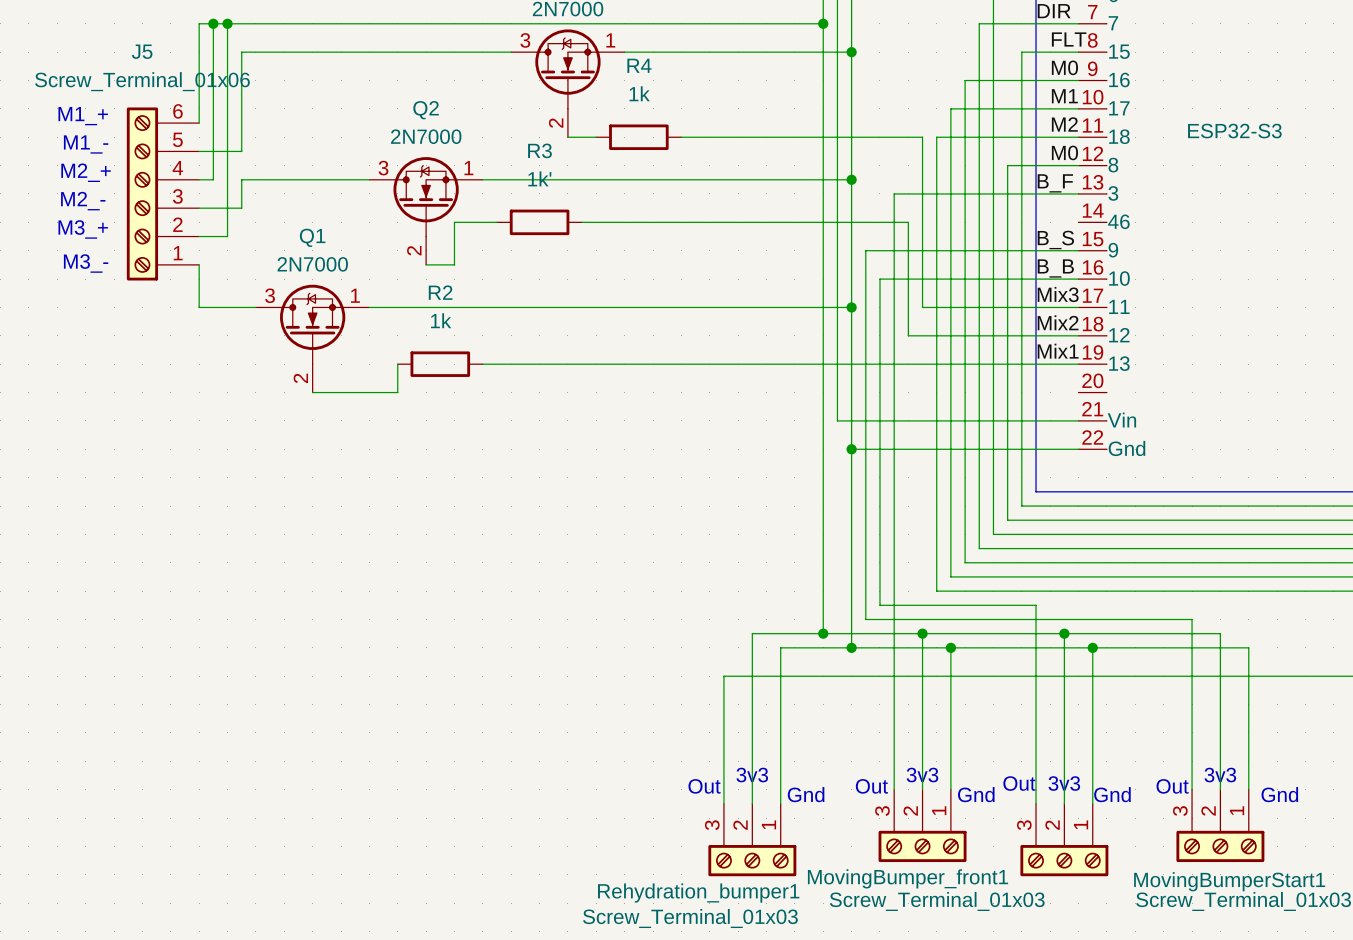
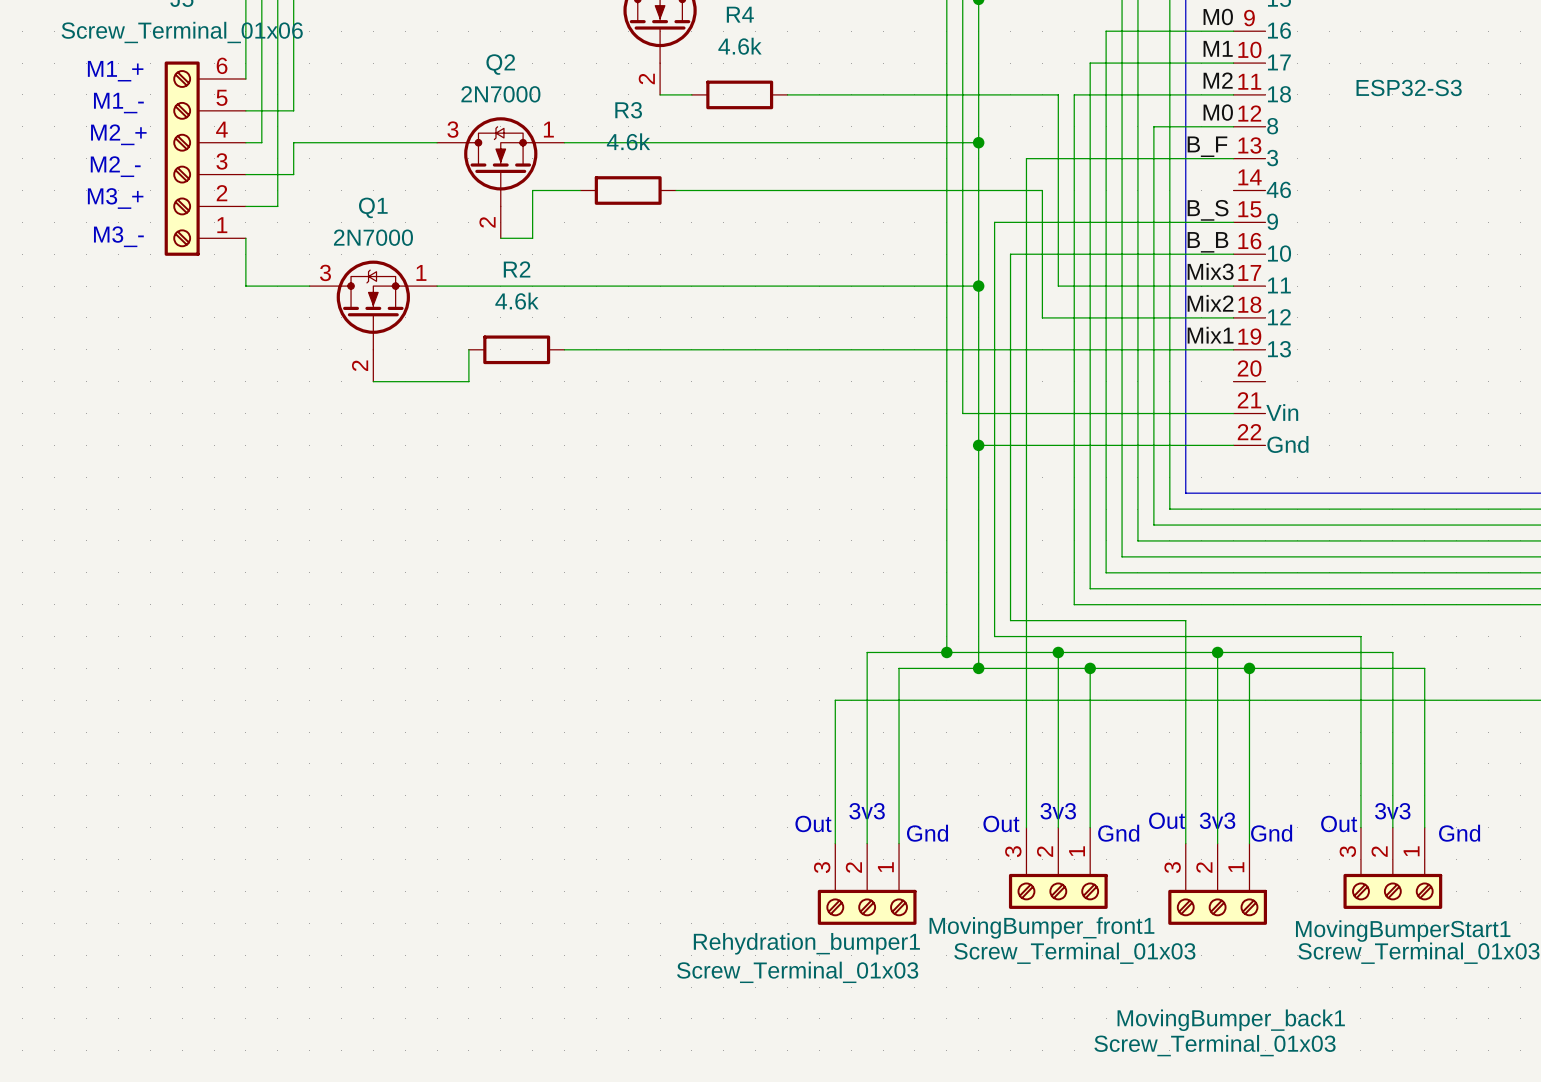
R4 value: 1k (639, 93) -> 4.6k (740, 46)
R3 value: 1k' (539, 178) -> 4.6k (628, 141)
R2 value: 1k (441, 320) -> 4.6k (516, 301)

